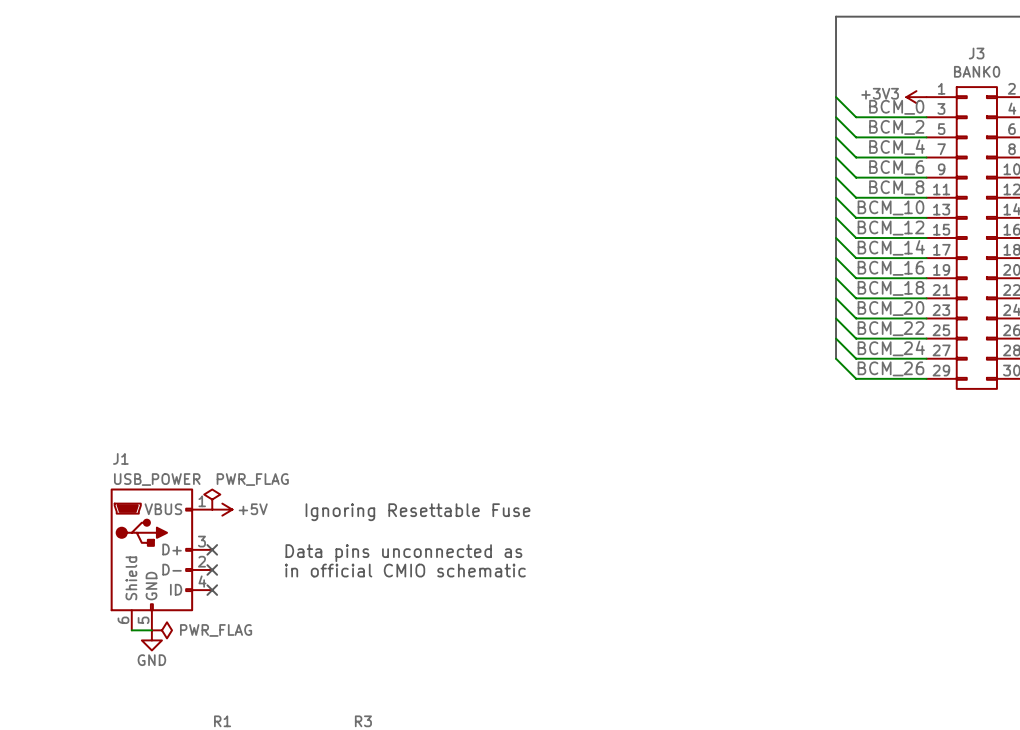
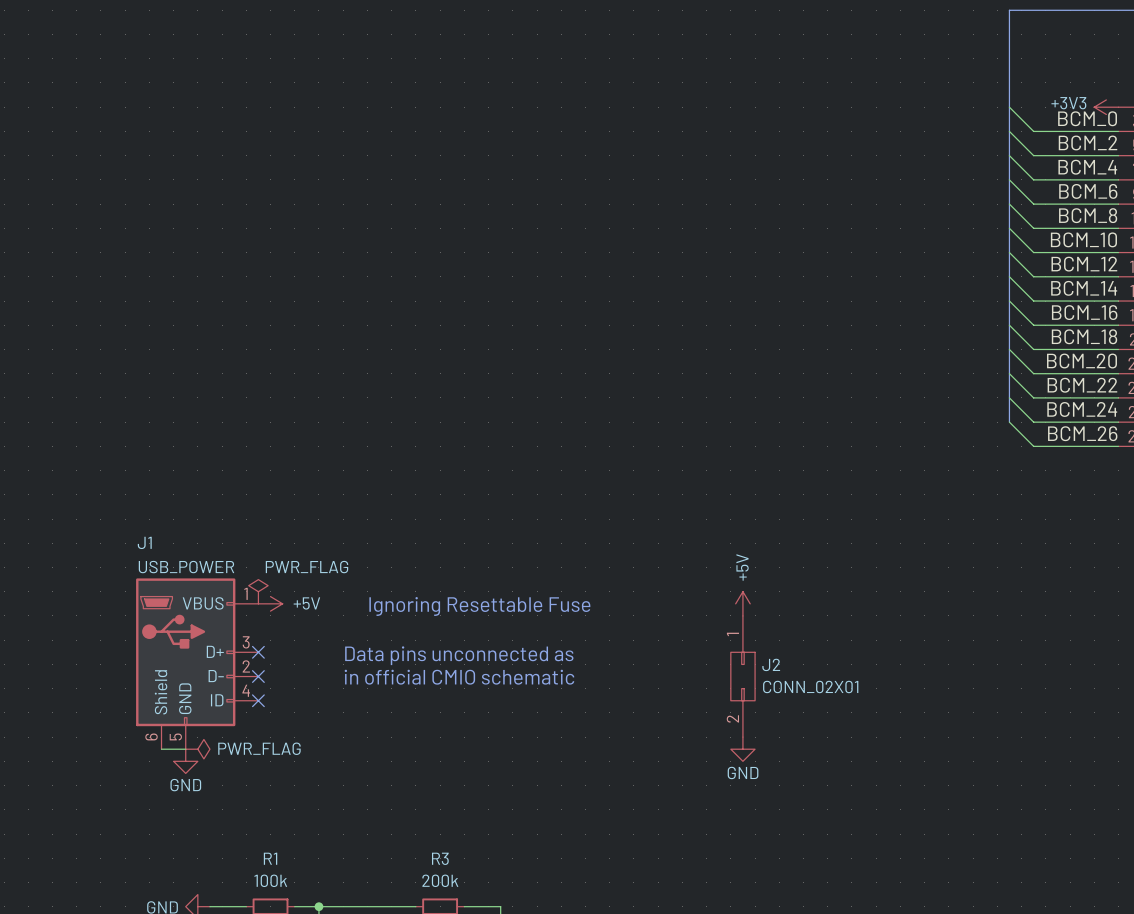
power symbol: none -> +5V (742, 603)
J2: none -> CONN_02X01 (742, 676)
power symbol: none -> GND (742, 749)

